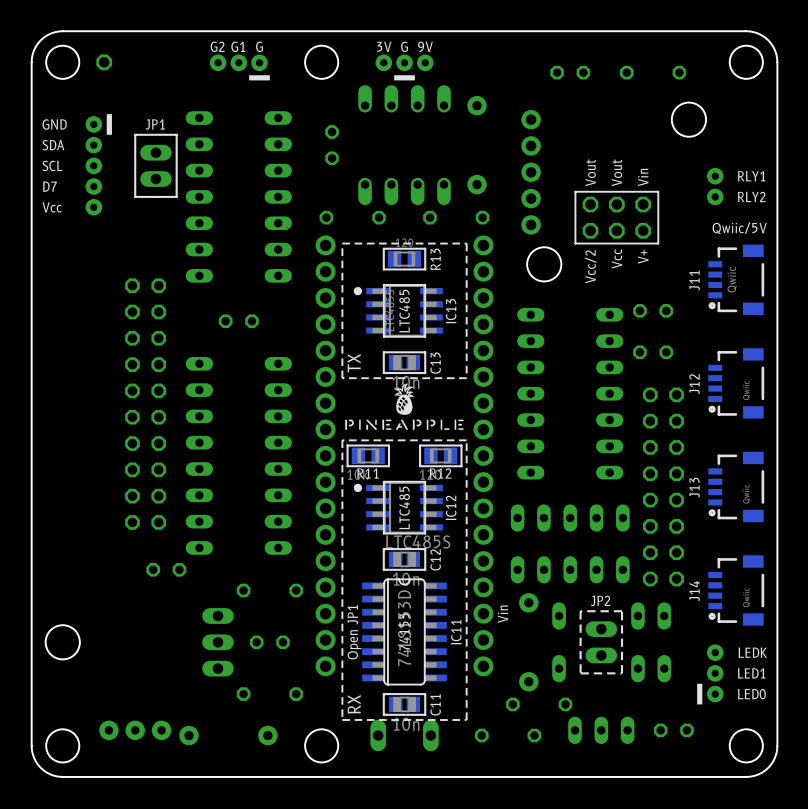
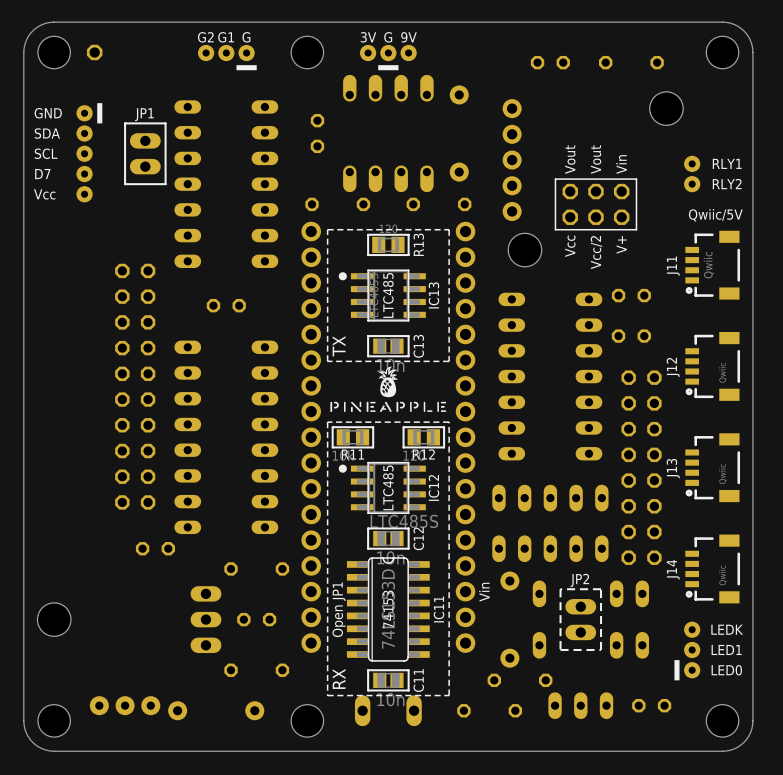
text: Vcc (616, 258) -> Vcc/2 (596, 252)
text: Vcc/2 (590, 266) -> Vcc (570, 246)

